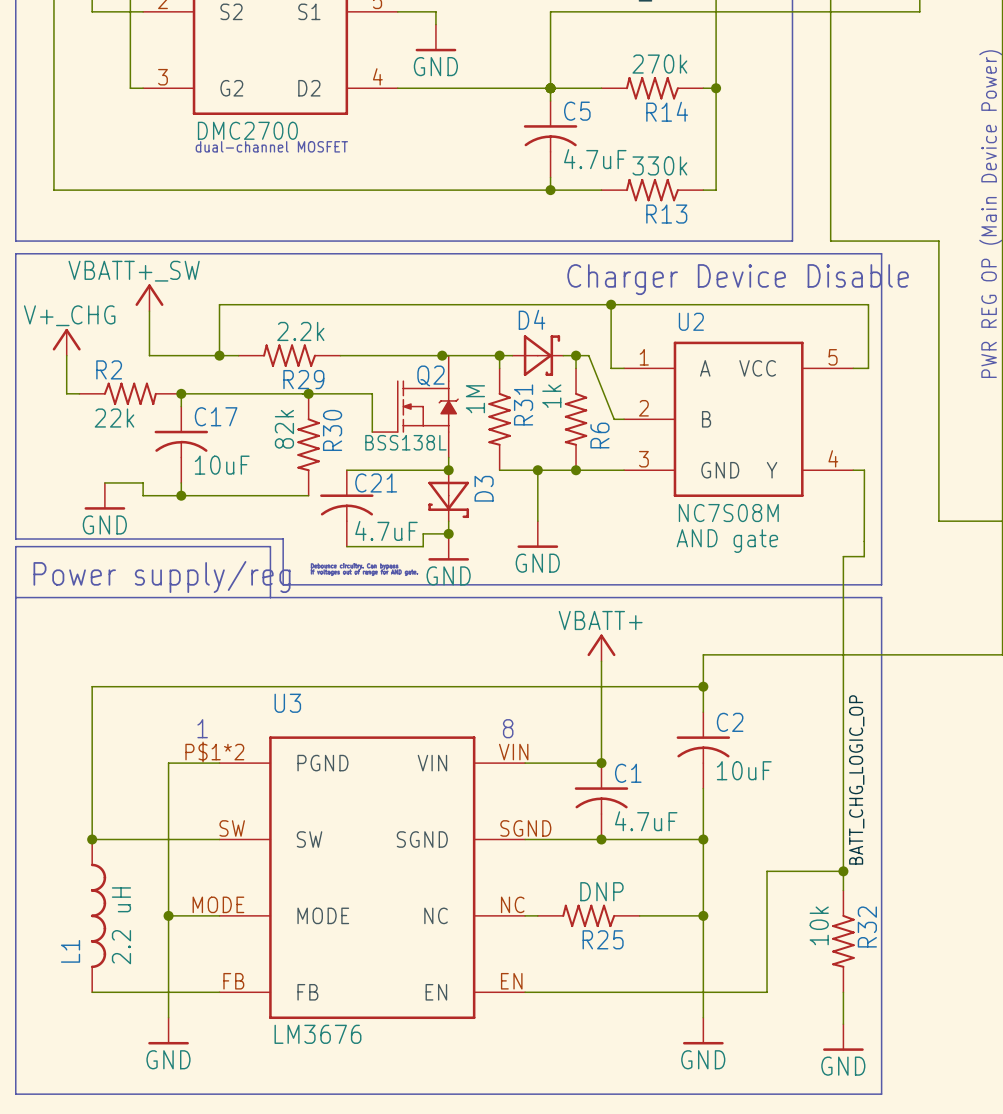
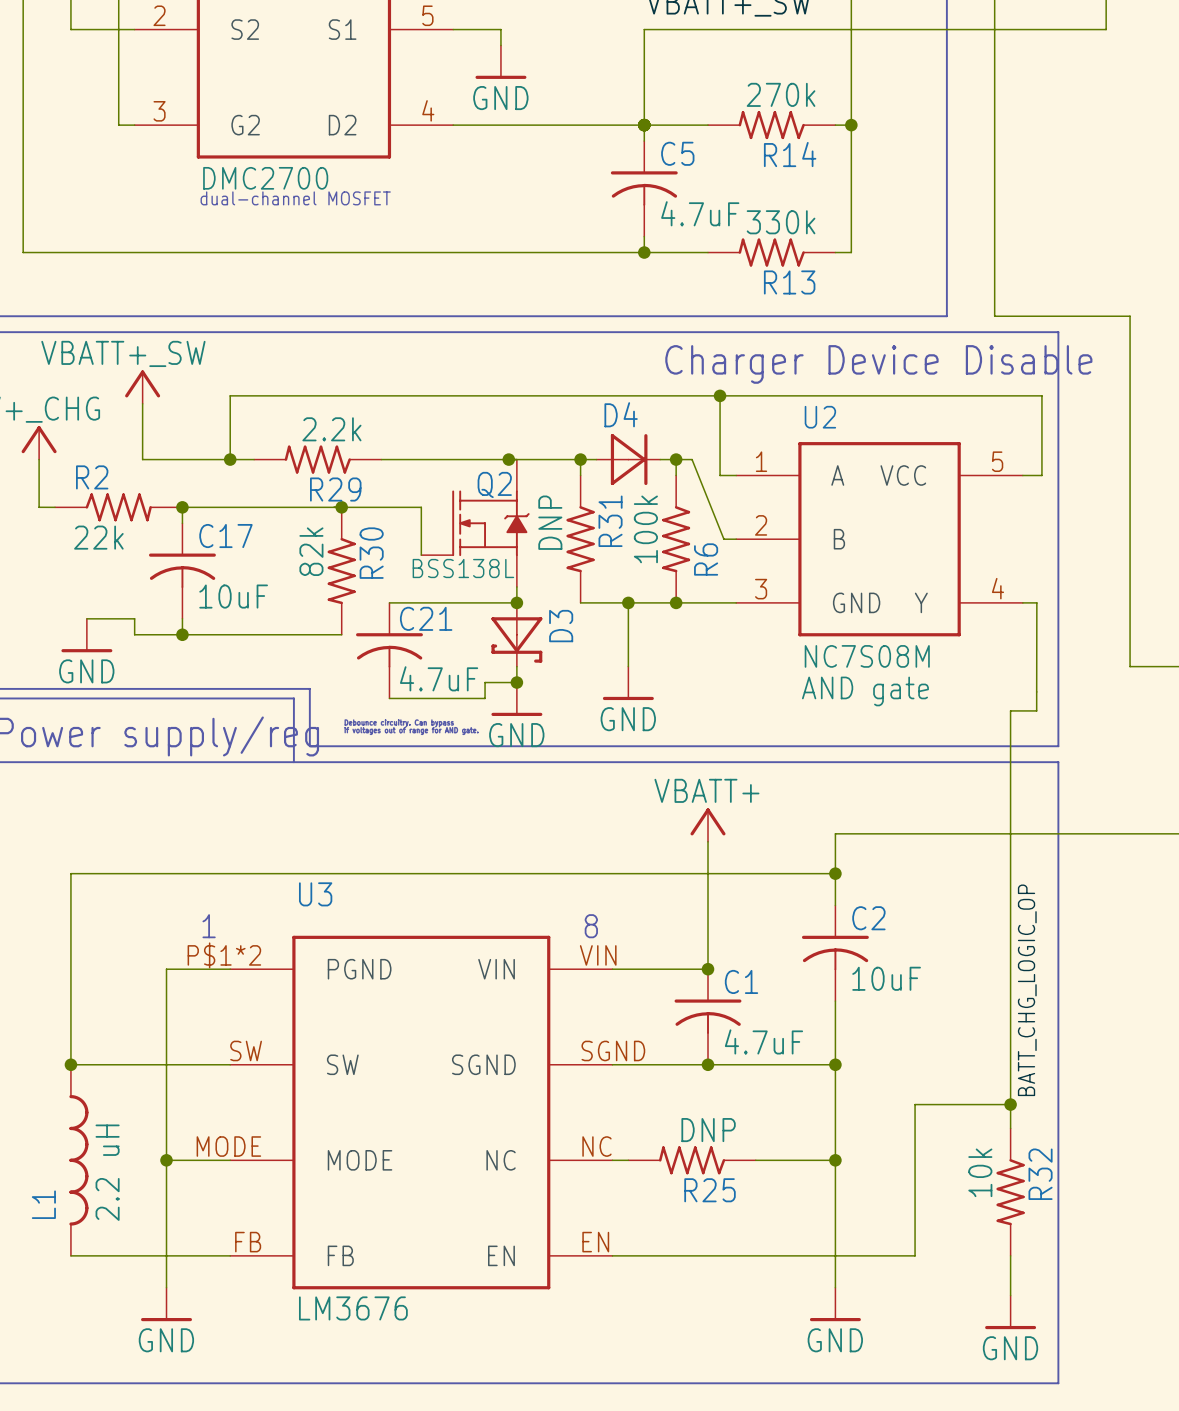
D4 symbol: [512, 335, 564, 377] -> [596, 434, 661, 486]
R6 value: 1k (551, 396) -> 100k (645, 529)
R31 value: 1M (475, 399) -> DNP (550, 522)

